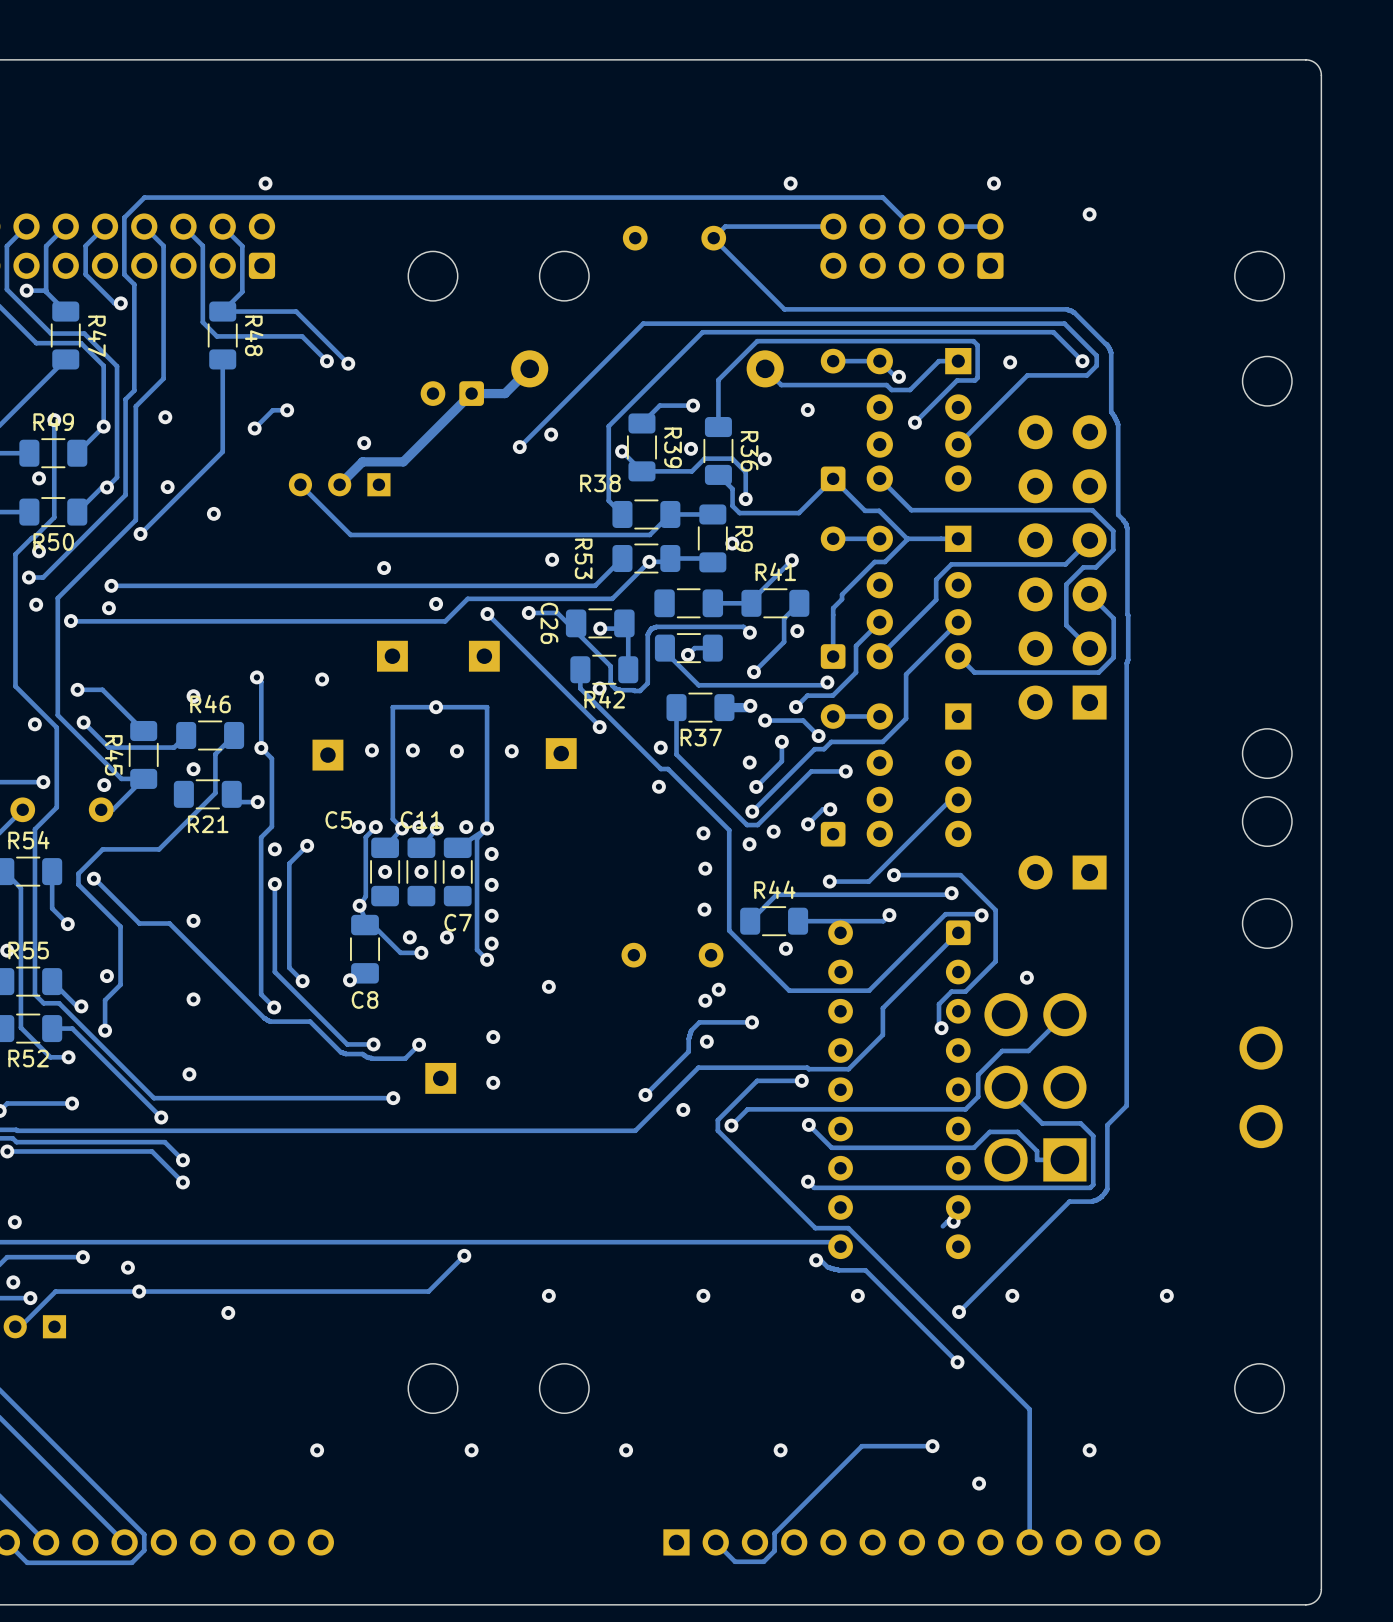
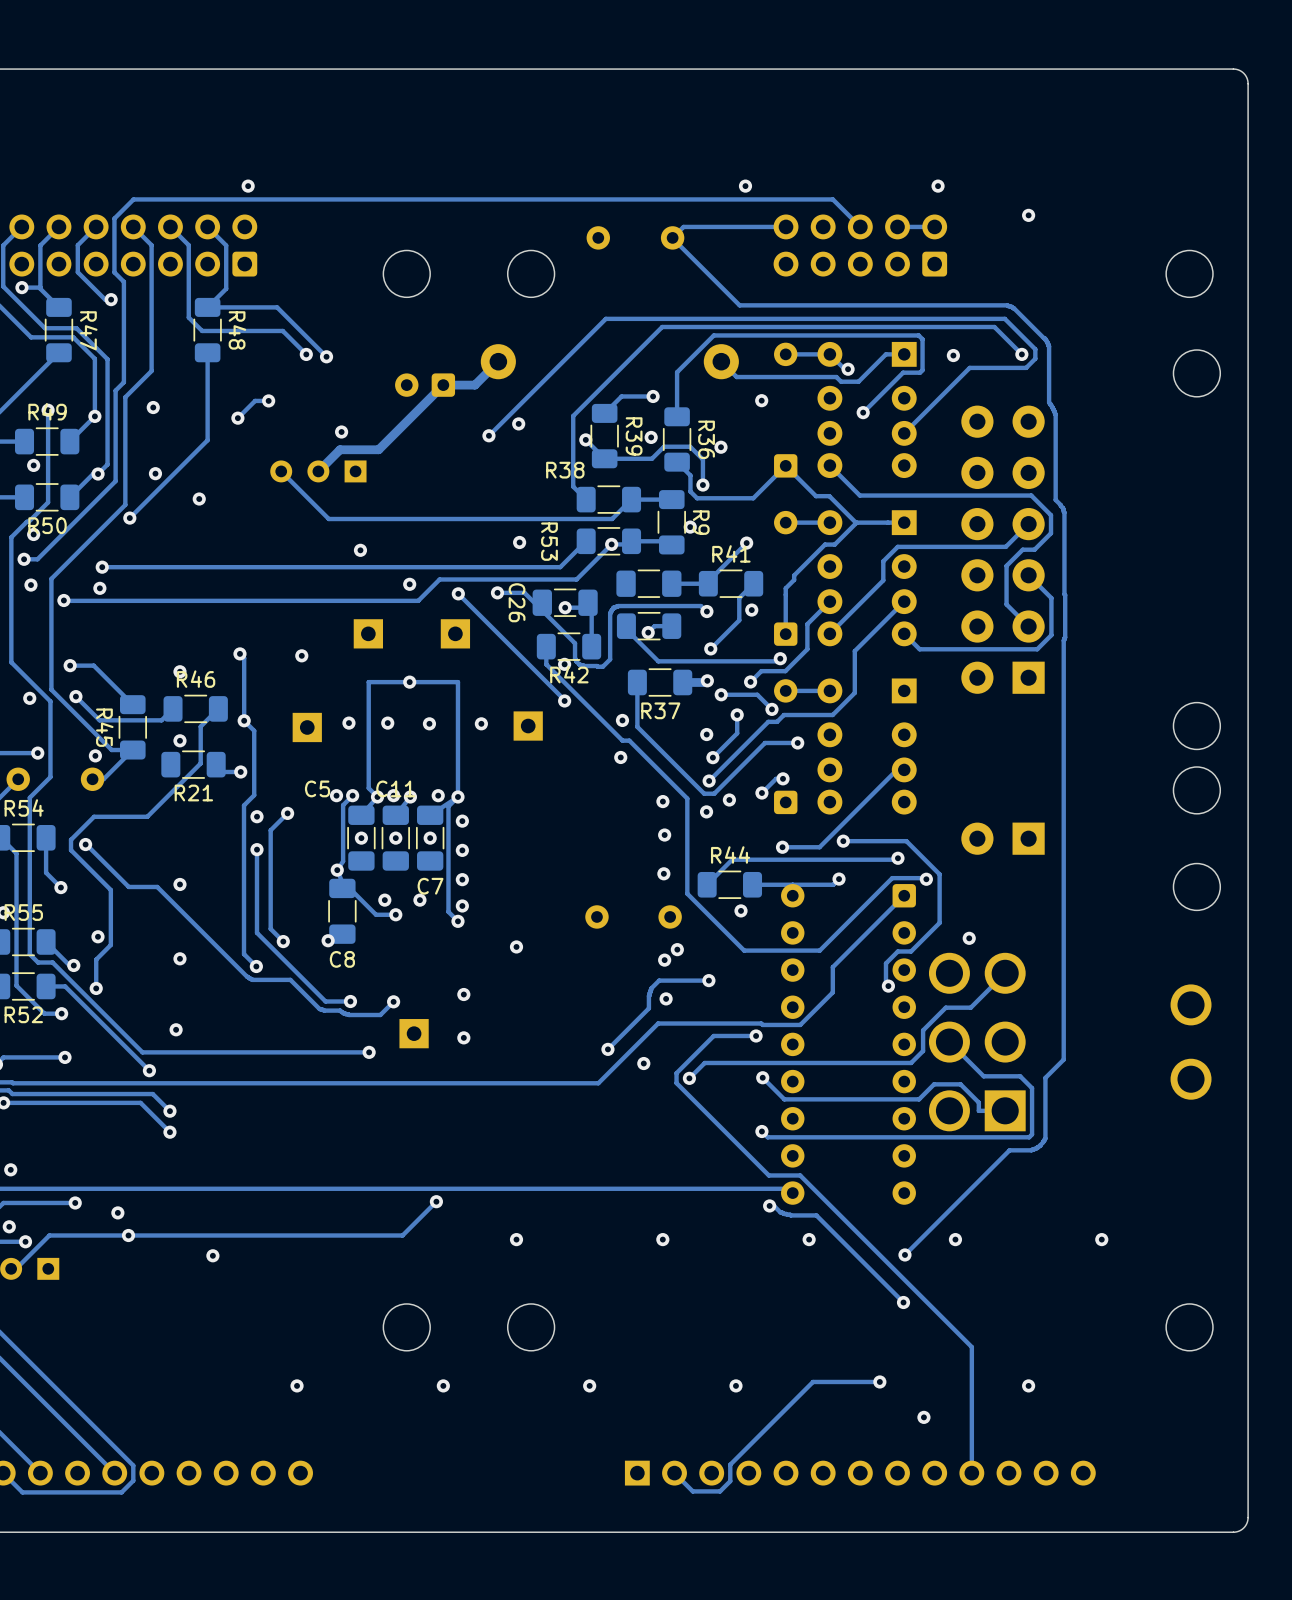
track: (953, 1221) (947, 1221) (942, 1226) -> none
via: (953, 1221) -> none

